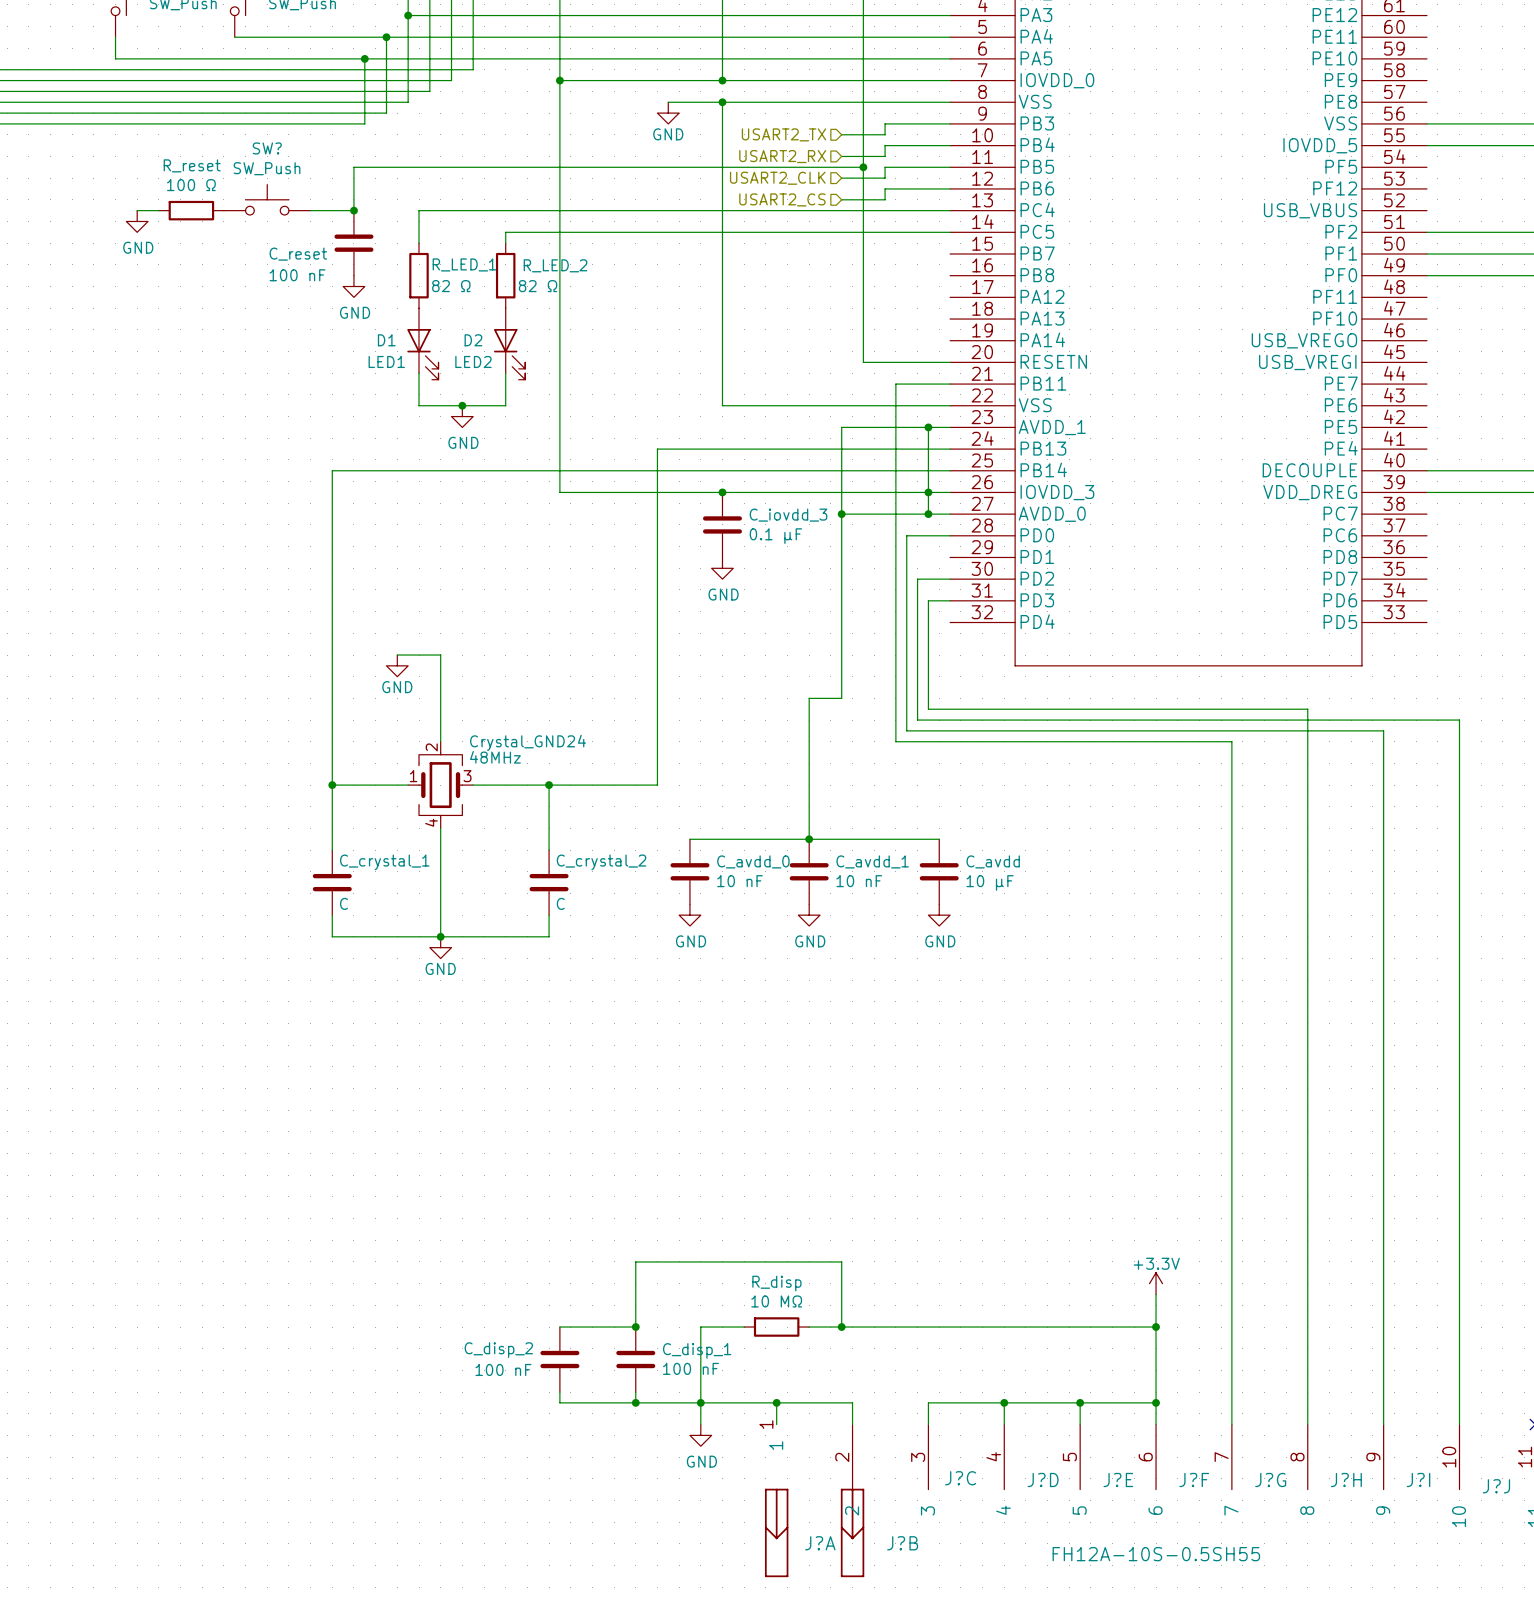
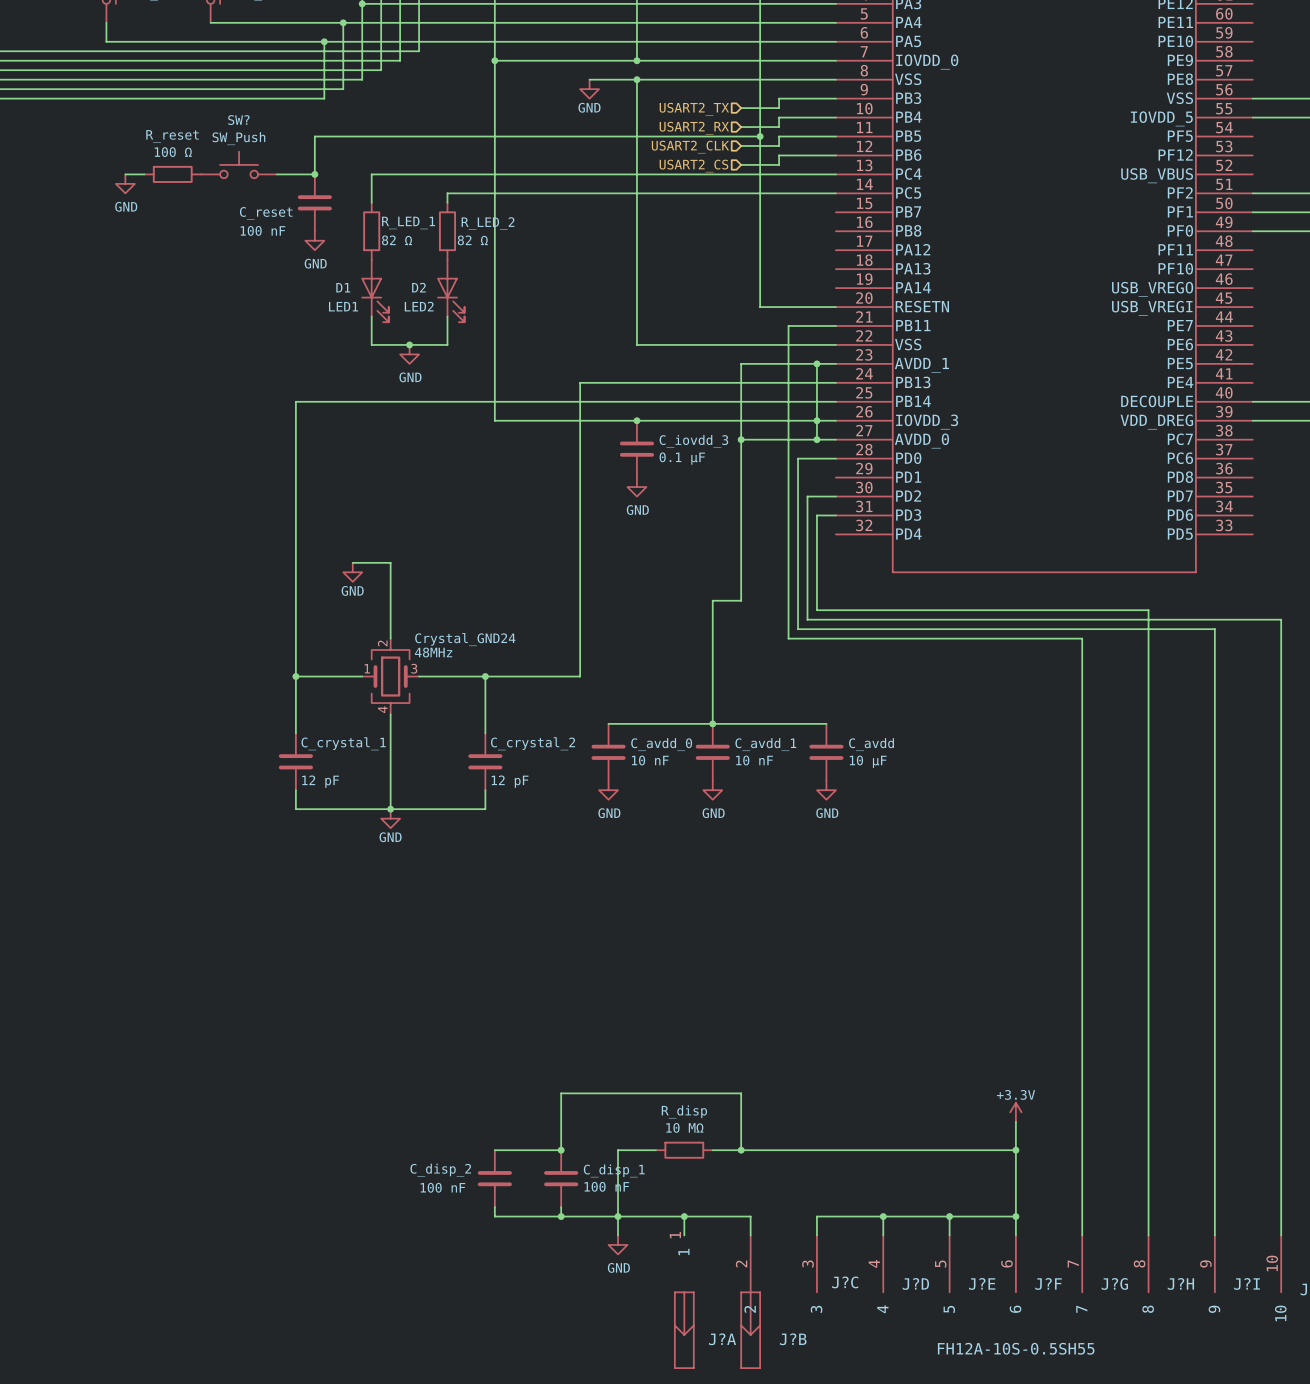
C_crystal_1 value: C (343, 903) -> 12 pF (320, 781)
C_crystal_2 value: C (560, 903) -> 12 pF (510, 781)

